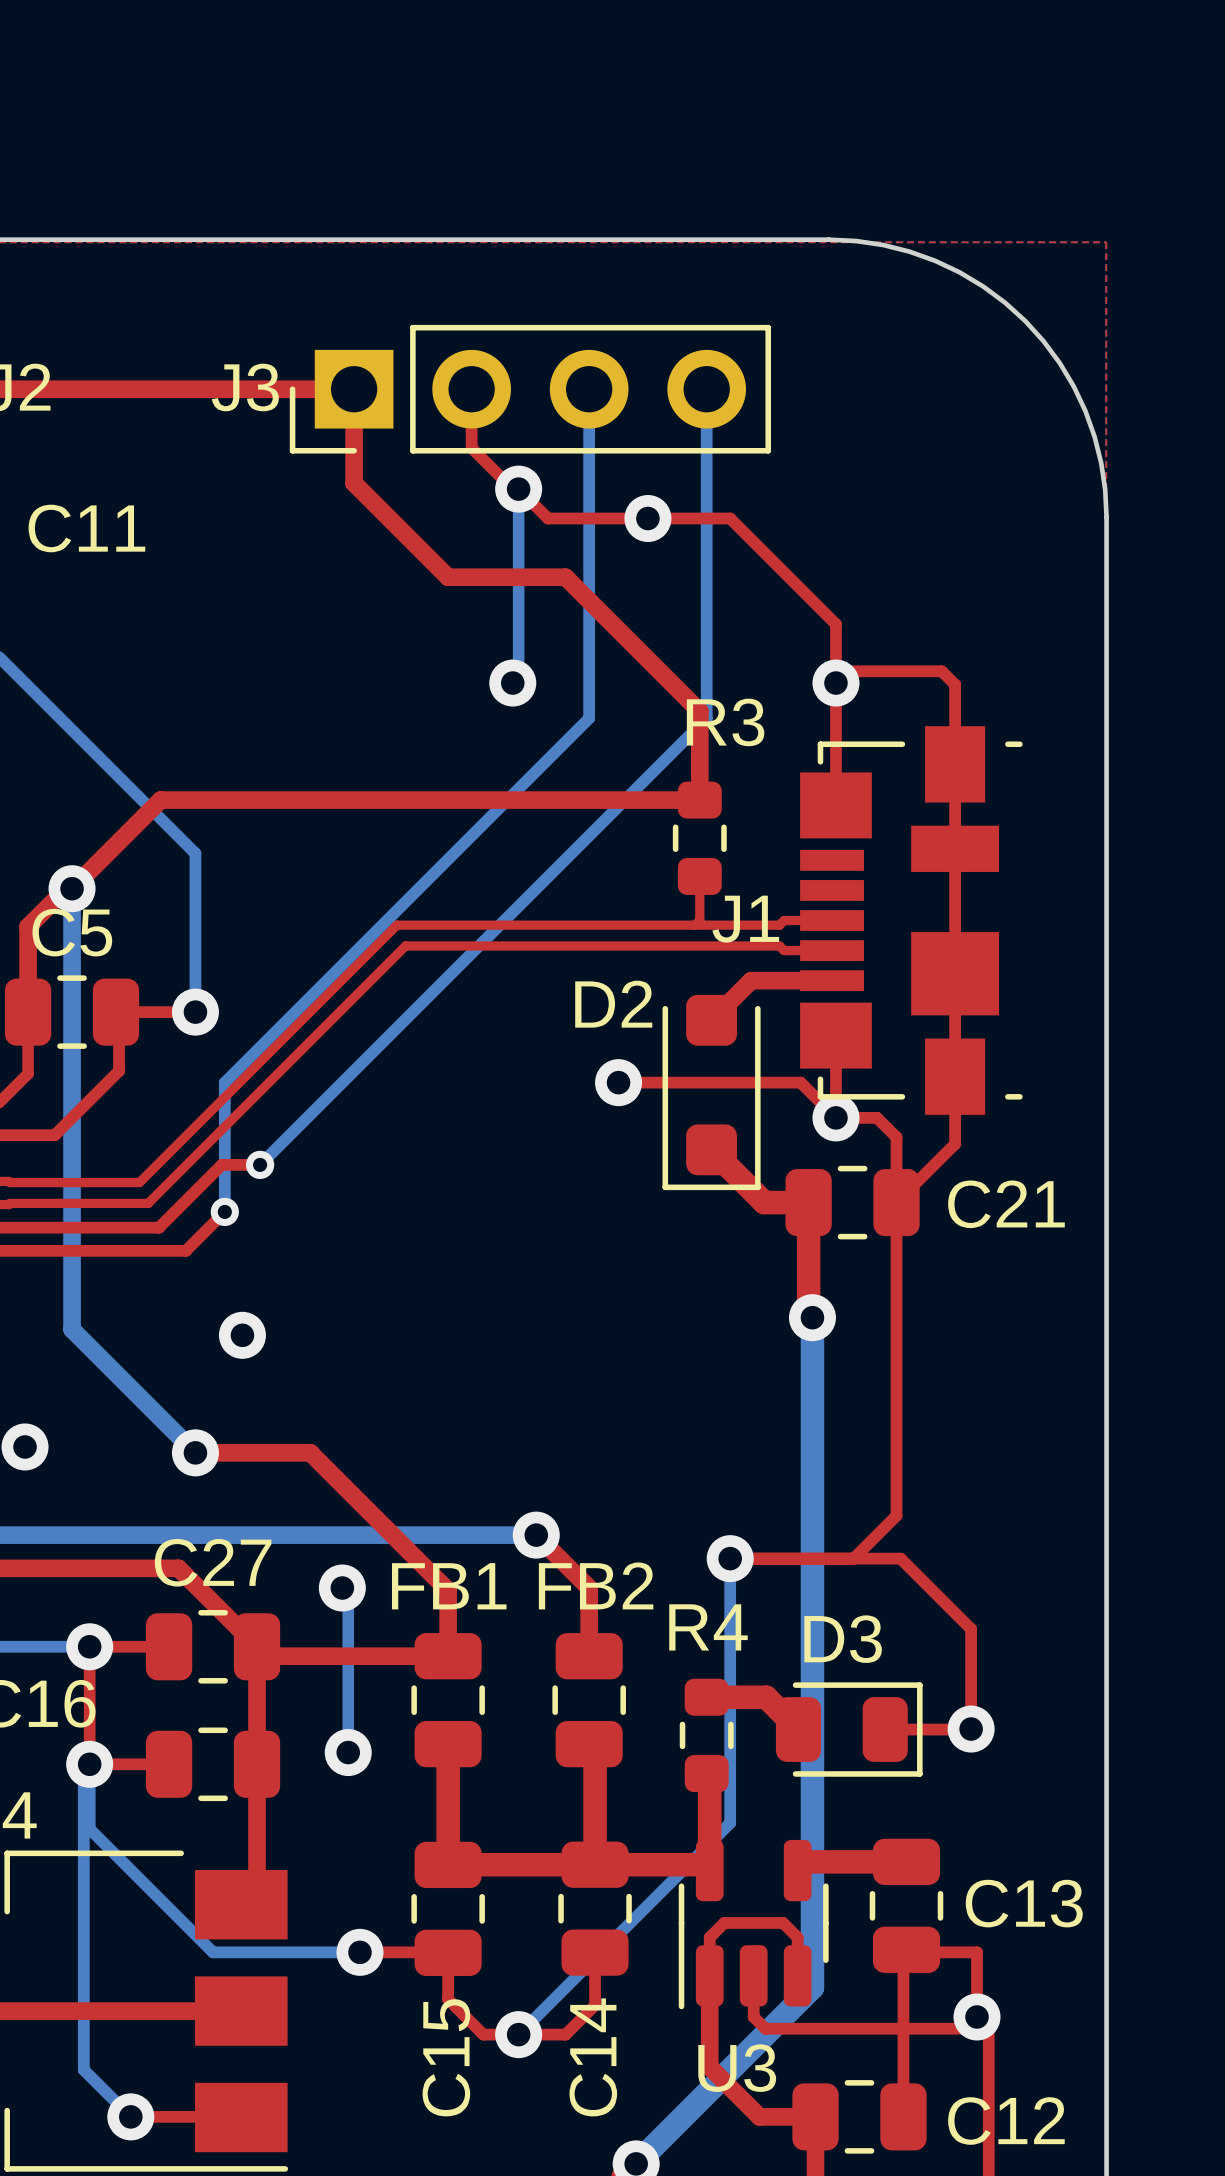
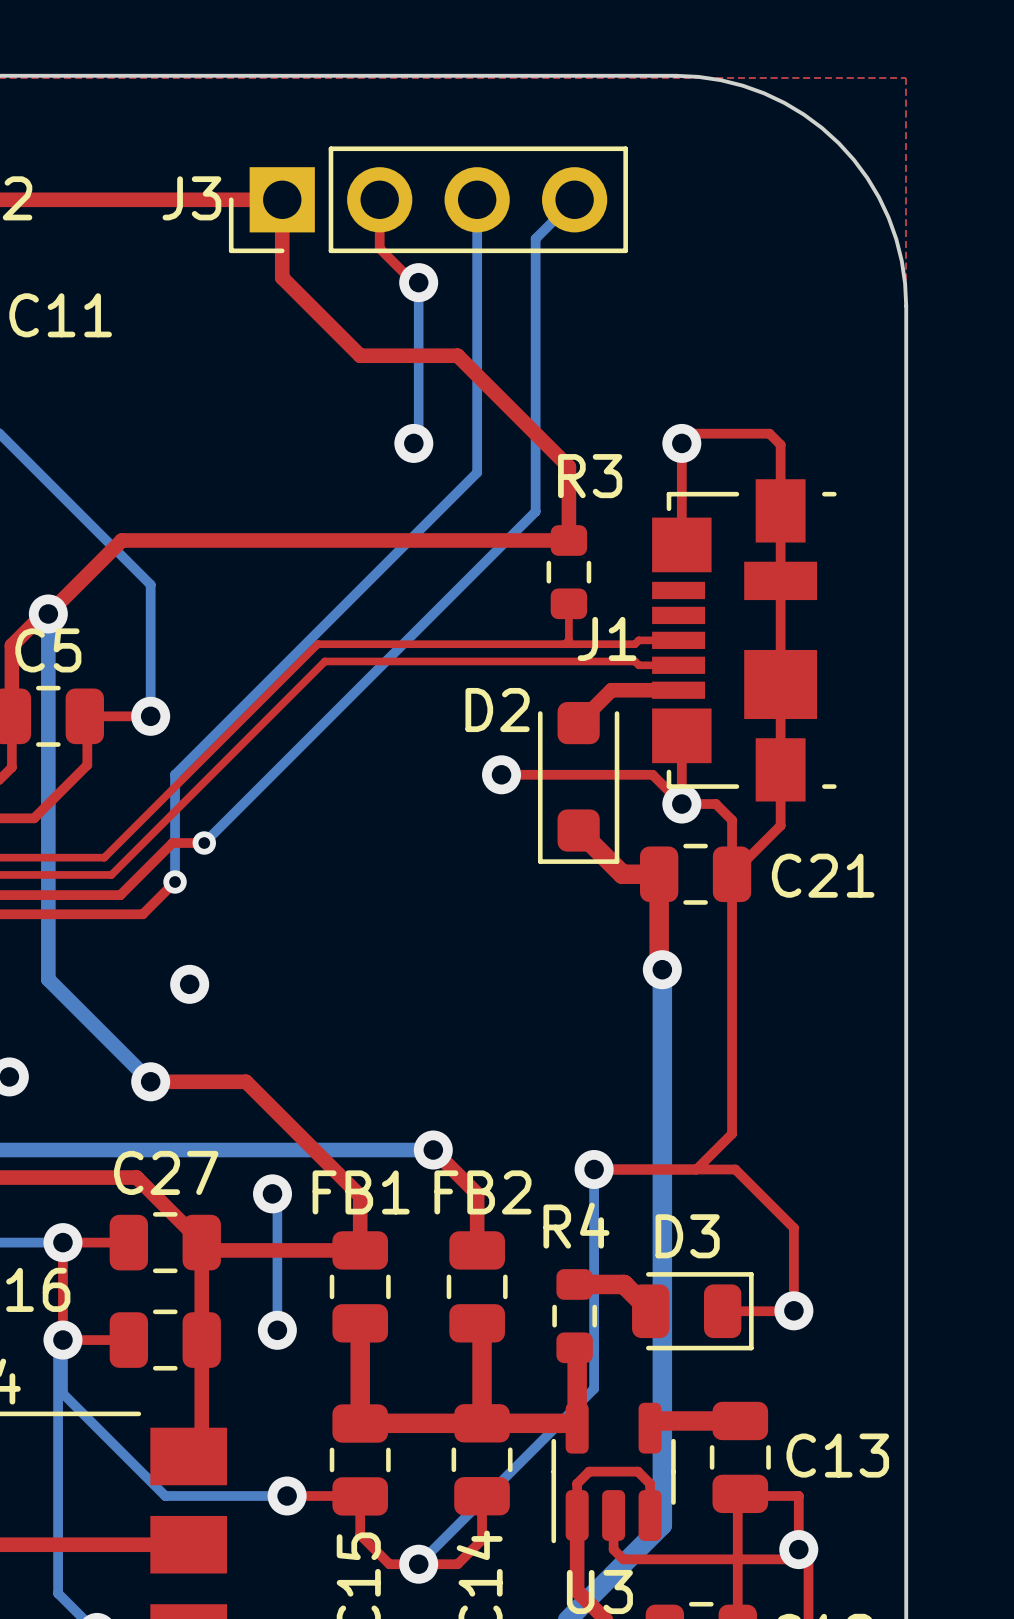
bottom track: (706, 389) (706, 718) (659, 765) -> (574, 199) (535, 238) (535, 511)
top track: (518, 489) (548, 518) (730, 518) (835, 624) (835, 683) -> none
via: (647, 518) -> none

